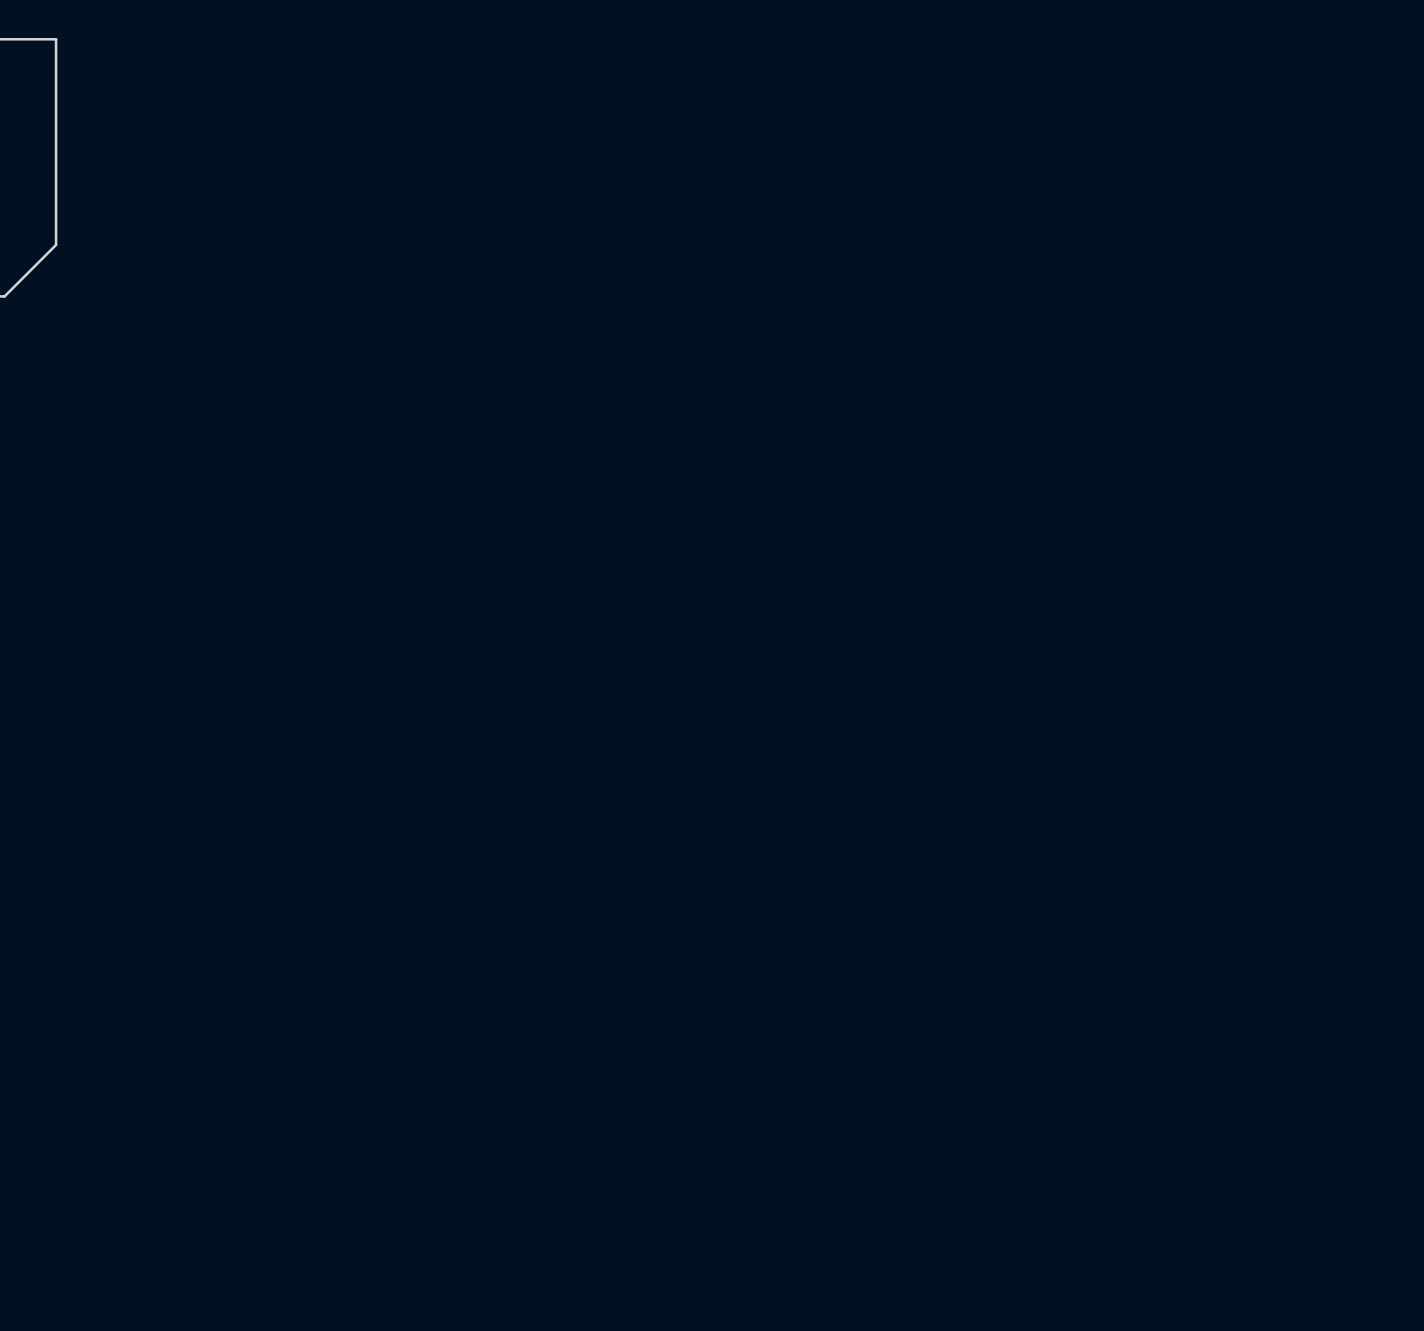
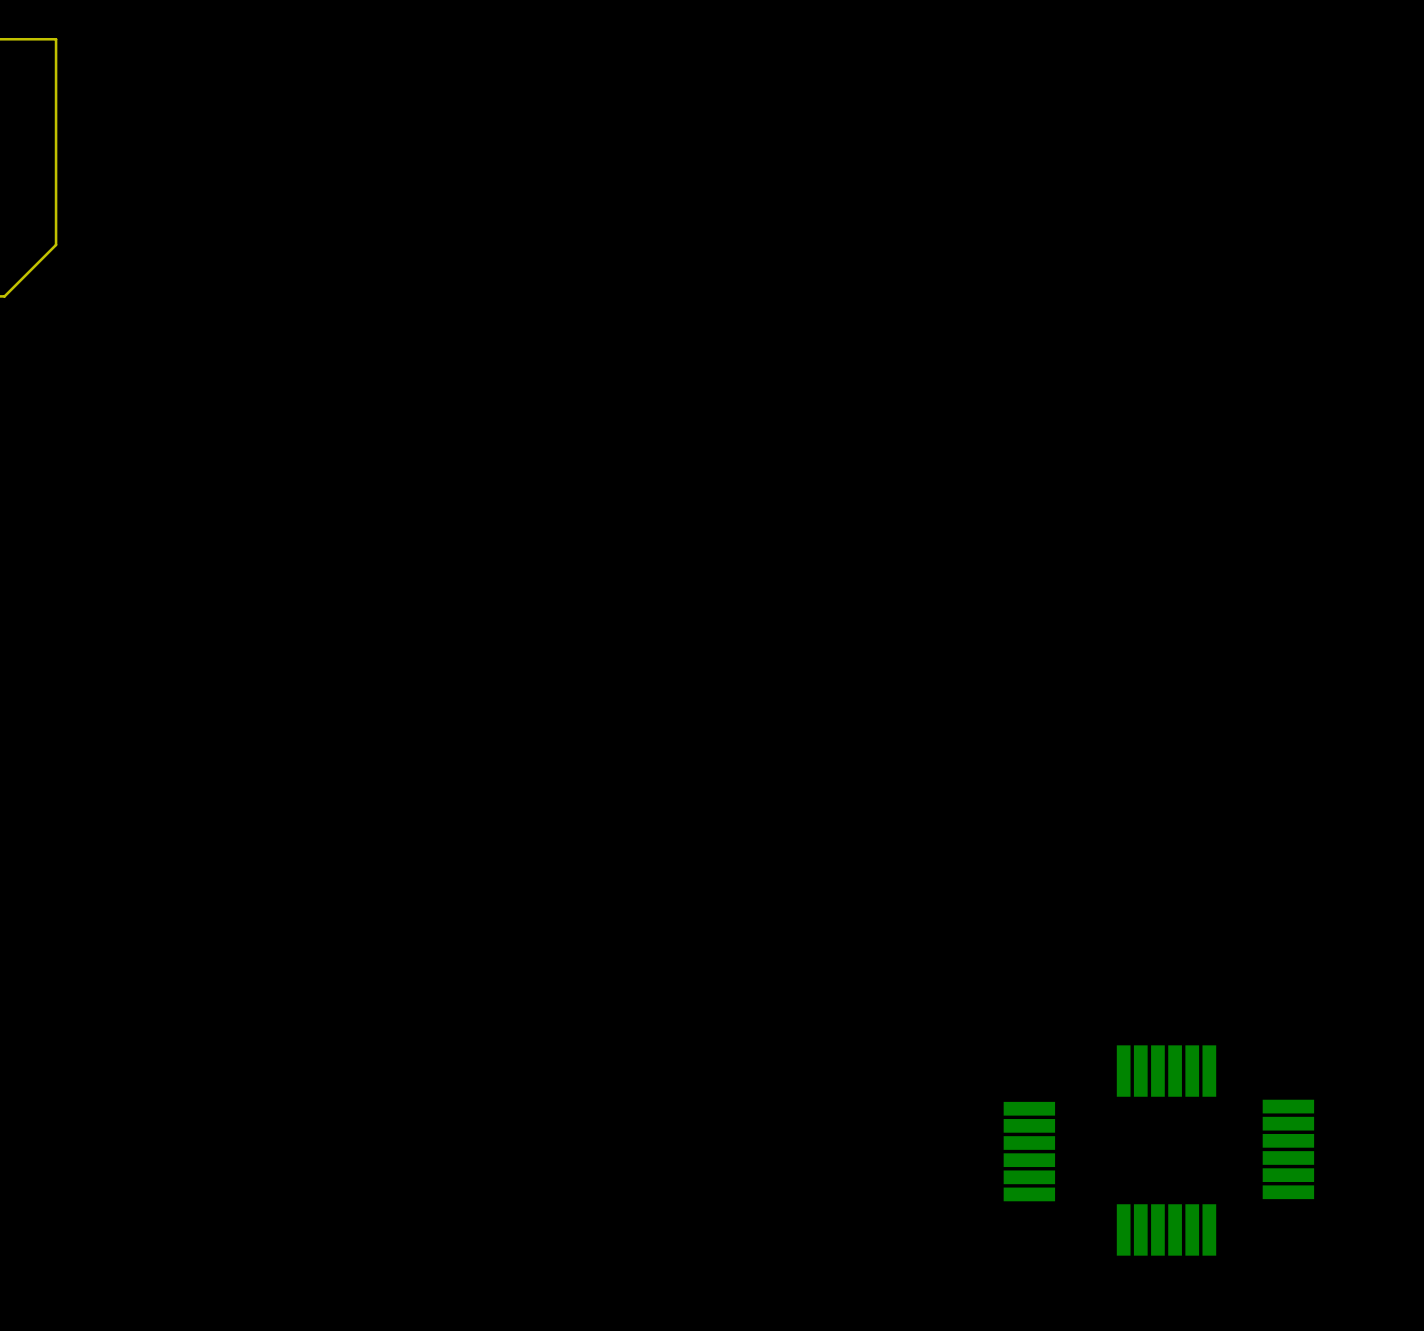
part: none -> (1166, 1071)
part: none -> (1288, 1149)
part: none -> (1029, 1151)
part: none -> (1166, 1229)

